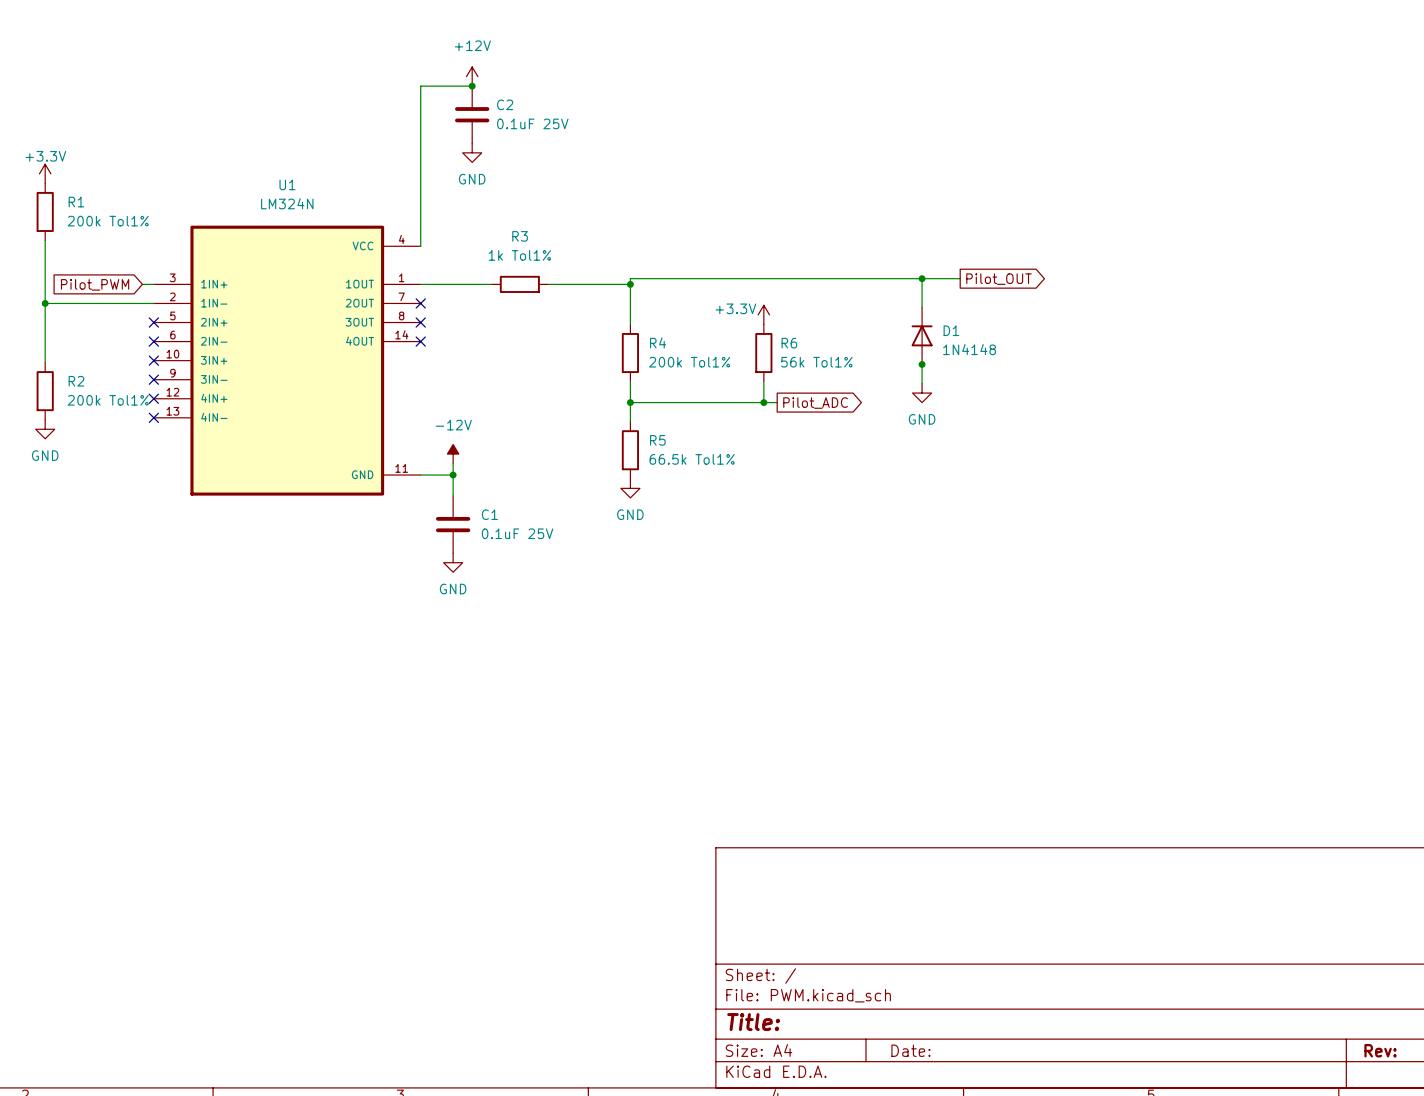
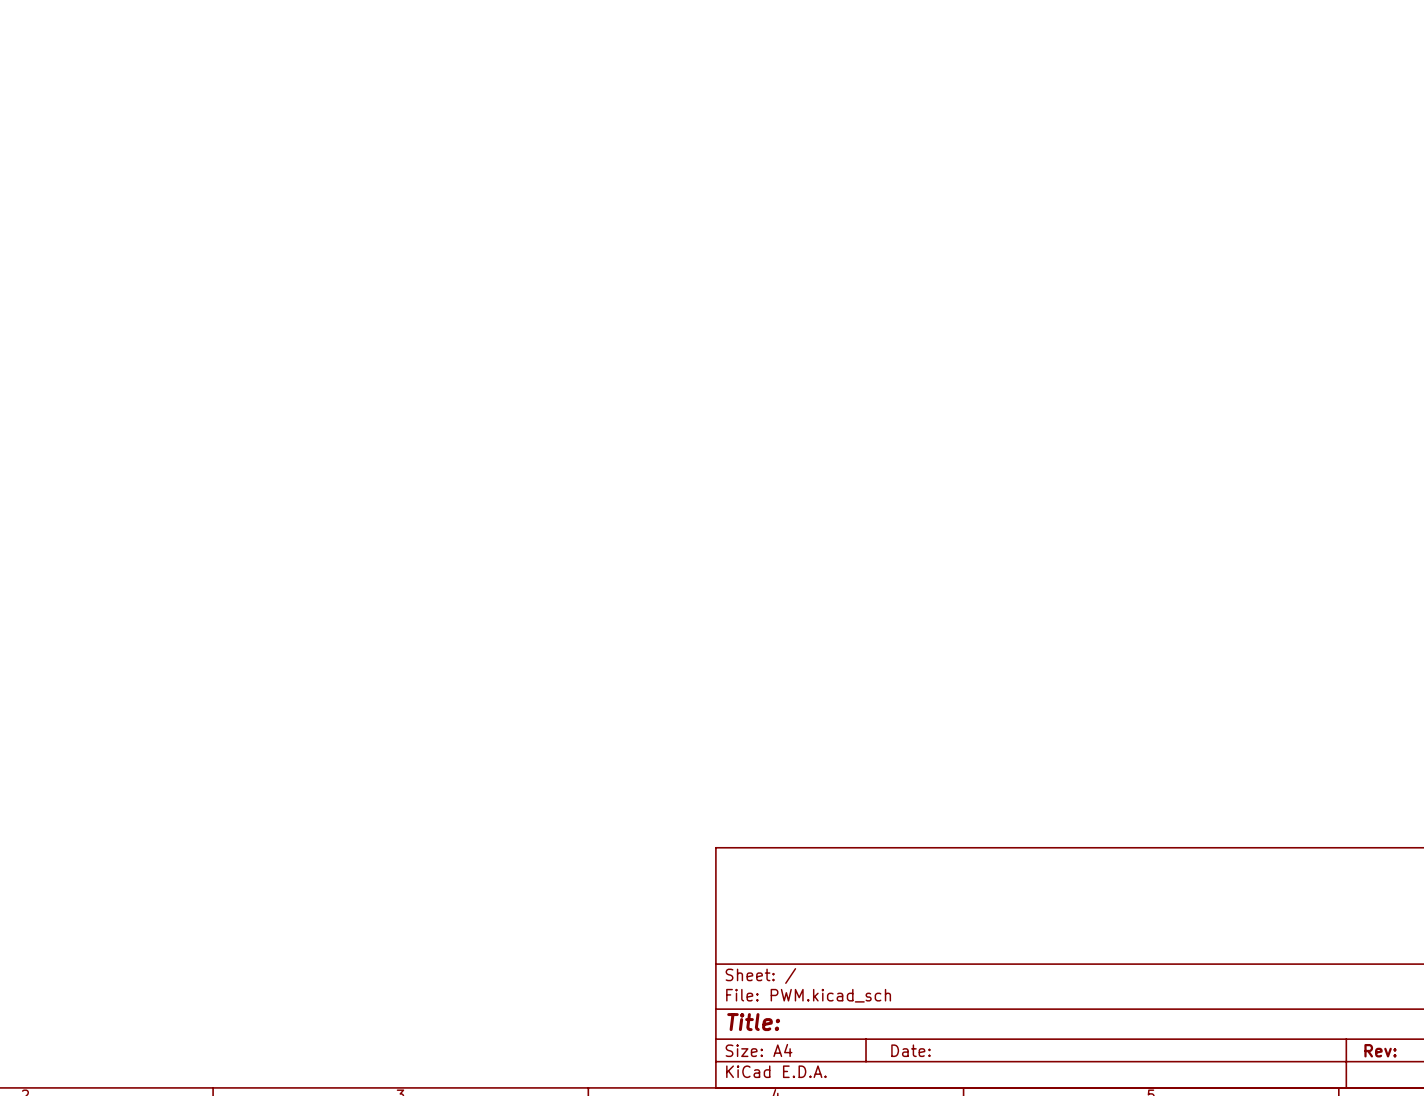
power symbol: +12V (472, 76) -> none
wire: (472, 86) (420, 86) (420, 246) -> none
junction: (472, 86) -> none
C2: 0.1uF 25V (472, 114) -> none
power symbol: GND (472, 152) -> none
power symbol: +3.3V (45, 173) -> none
R1: 200k Tol1% (45, 211) -> none
wire: (45, 240) (45, 362) -> none
wire: (922, 278) (922, 307) -> none
junction: (922, 278) -> none
wire: (960, 278) (630, 278) (630, 324) -> none
global label: Pilot_OUT (999, 279) -> none
global label: Pilot_PWM (95, 284) -> none
wire: (142, 284) (153, 284) -> none
wire: (420, 284) (491, 284) -> none
R3: 1k Tol1% (519, 284) -> none
wire: (548, 284) (630, 284) -> none
junction: (630, 284) -> none
wire: (45, 303) (153, 303) -> none
junction: (45, 303) -> none
no-connect mark: (420, 303) -> none
power symbol: +3.3V (763, 314) -> none
no-connect mark: (153, 322) -> none
no-connect mark: (420, 322) -> none
D1: 1N4148 (922, 335) -> none
no-connect mark: (153, 341) -> none
no-connect mark: (420, 341) -> none
R4: 200k Tol1% (630, 353) -> none
R6: 56k Tol1% (763, 353) -> none
no-connect mark: (153, 360) -> none
U1: LM324N (287, 360) -> none
wire: (923, 362) (922, 362) (922, 383) -> none
junction: (922, 364) -> none
no-connect mark: (153, 379) -> none
wire: (630, 381) (630, 421) -> none
wire: (763, 381) (763, 402) -> none
R2: 200k Tol1% (45, 391) -> none
power symbol: GND (922, 393) -> none
no-connect mark: (153, 398) -> none
wire: (630, 402) (777, 402) -> none
junction: (630, 402) -> none
junction: (763, 402) -> none
global label: Pilot_ADC (815, 403) -> none
no-connect mark: (153, 417) -> none
power symbol: GND (45, 429) -> none
R5: 66.5k Tol1% (630, 450) -> none
power symbol: -12V (453, 454) -> none
wire: (453, 463) (453, 495) -> none
wire: (420, 475) (453, 475) -> none
junction: (453, 475) -> none
power symbol: GND (630, 488) -> none
C1: 0.1uF 25V (453, 524) -> none
power symbol: GND (453, 562) -> none

